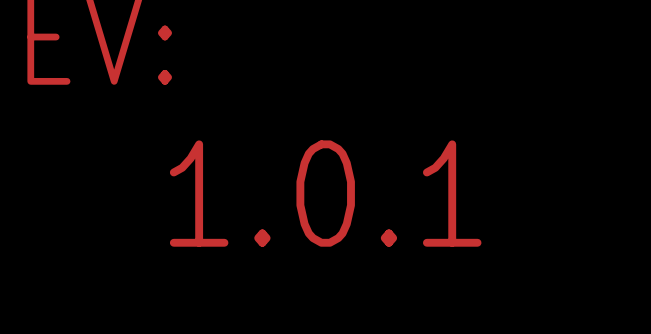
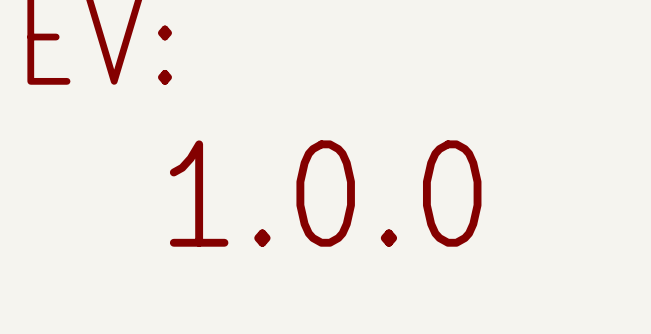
text: 1.0.1 (325, 193) -> 1.0.0 (325, 193)

